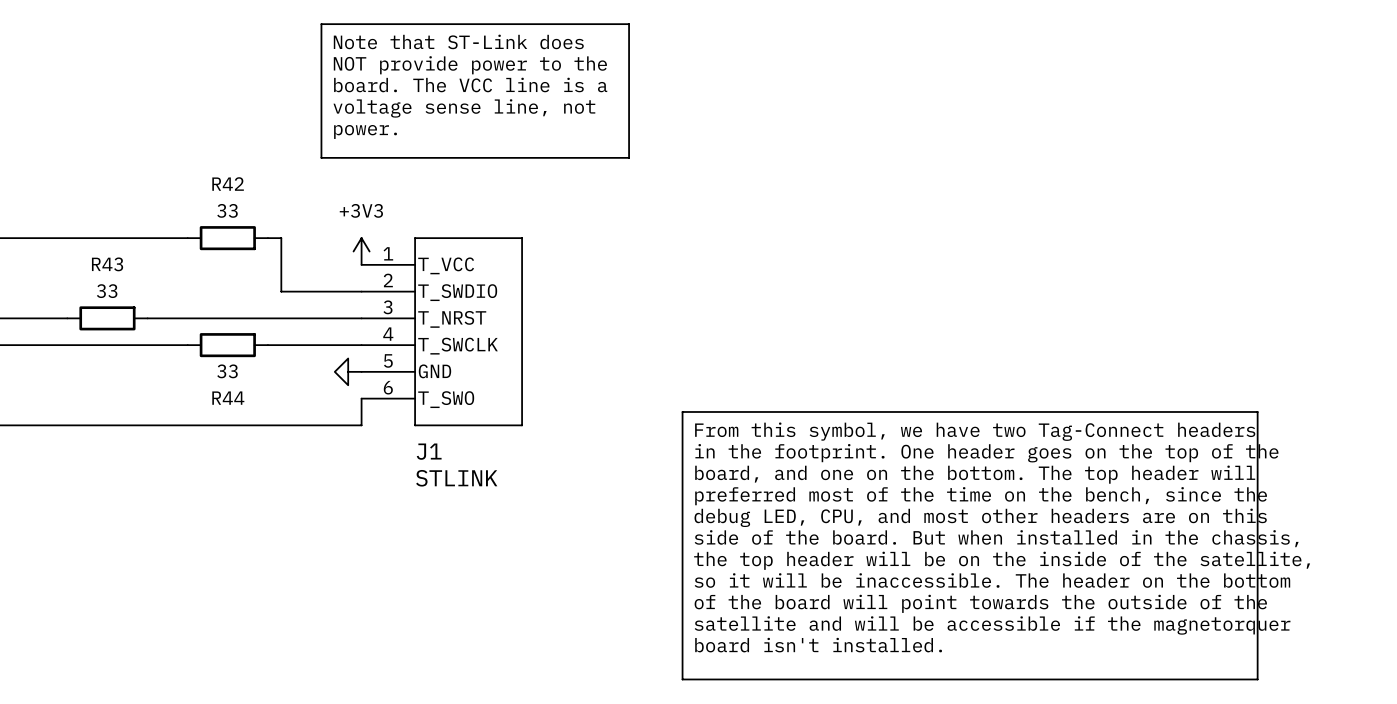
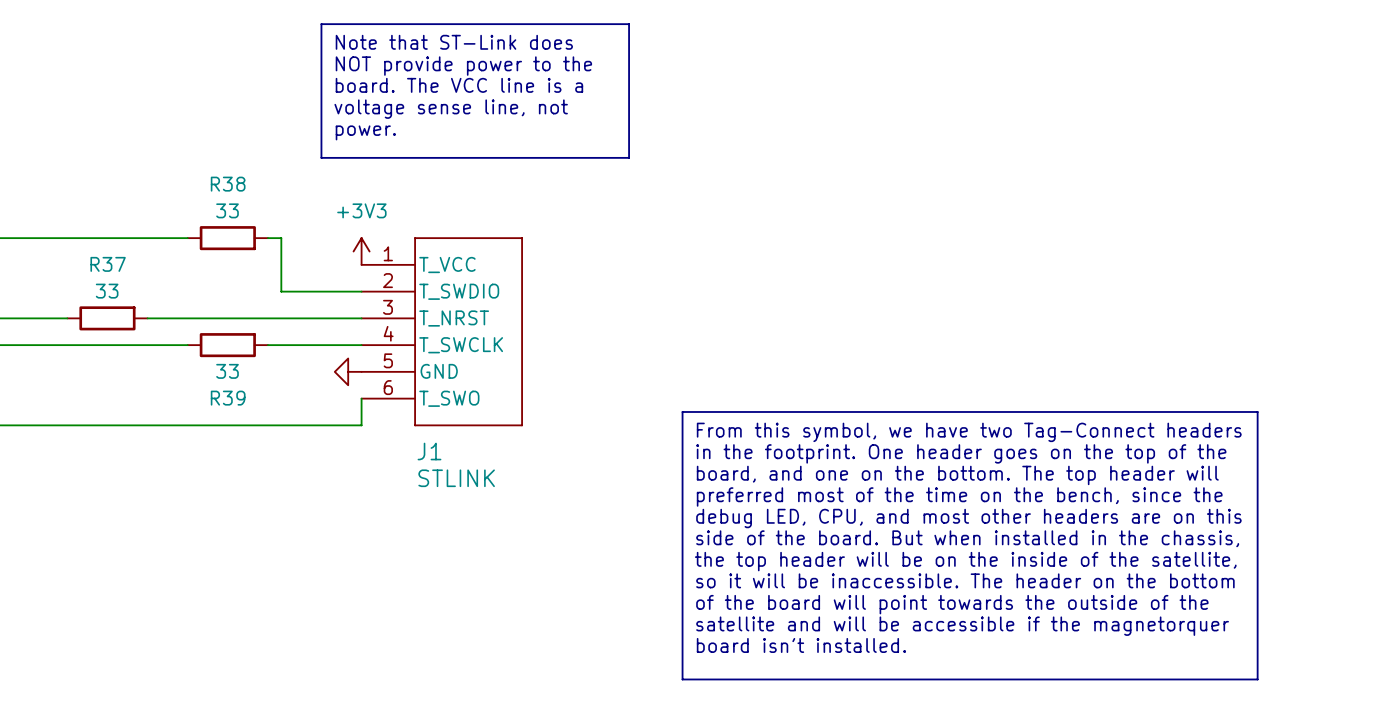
R42 name: R42 (228, 184) -> R38 (228, 184)
R43 name: R43 (107, 264) -> R37 (108, 264)
R44 name: R44 (228, 398) -> R39 (228, 398)

